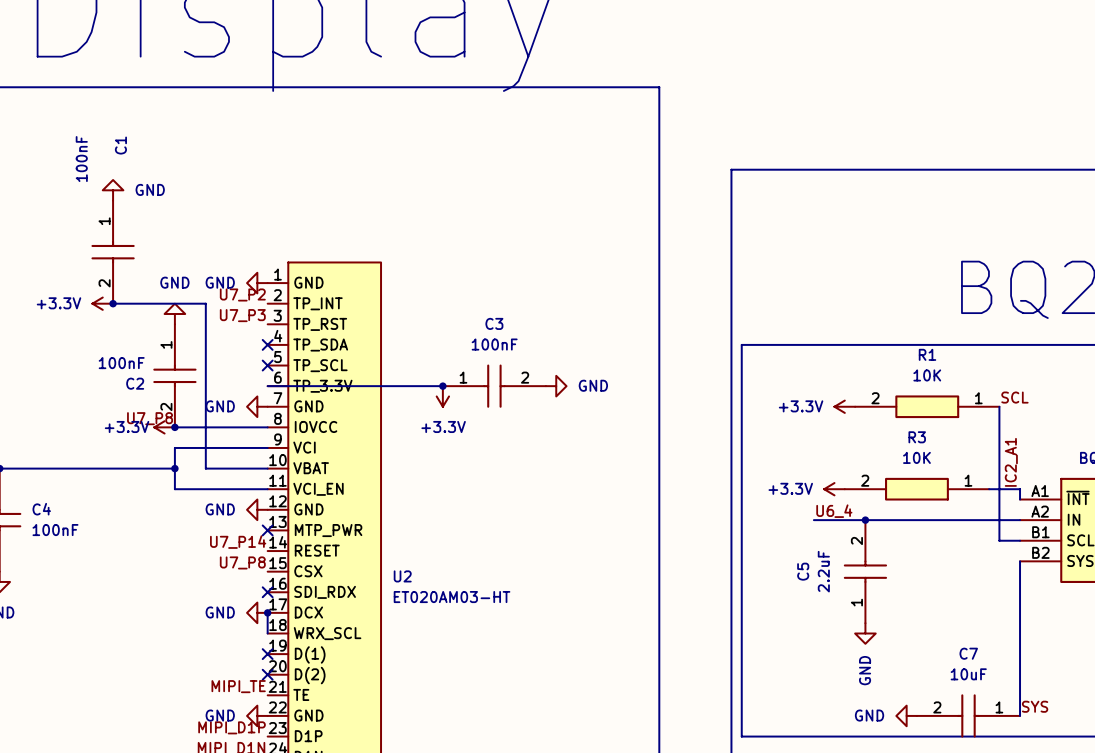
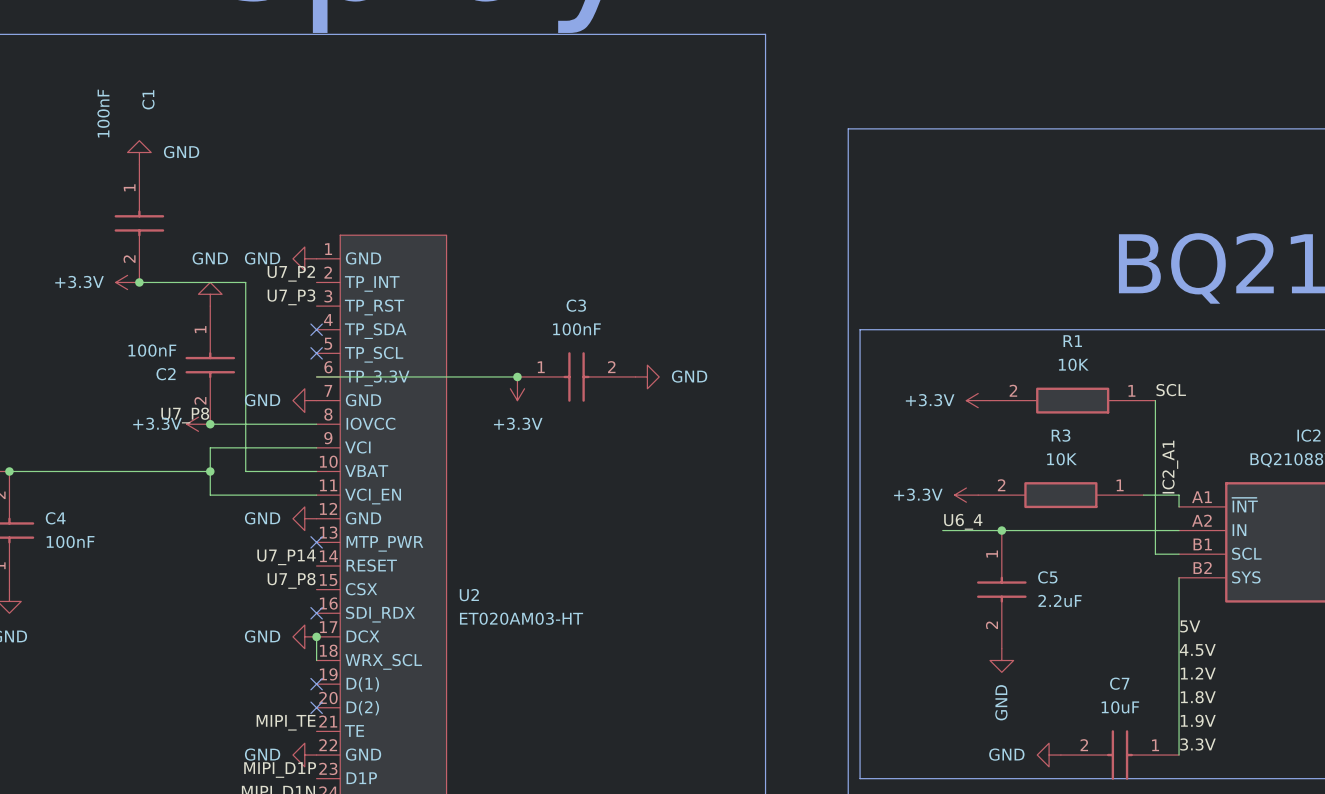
C5 name position: C5 (803, 571) -> C5 (1047, 577)
C5 value position: 2.2uF (823, 571) -> 2.2uF (1060, 601)
C5 rotation: 0° (865, 571) -> 180° (1001, 589)
label: none -> 5V (1190, 626)
label: none -> 4.5V (1197, 650)
label: none -> 1.2V (1198, 673)
label: none -> 1.8V (1198, 697)
label: none -> 1.9V (1198, 720)
label: SYS (1035, 706) -> 3.3V (1198, 744)

